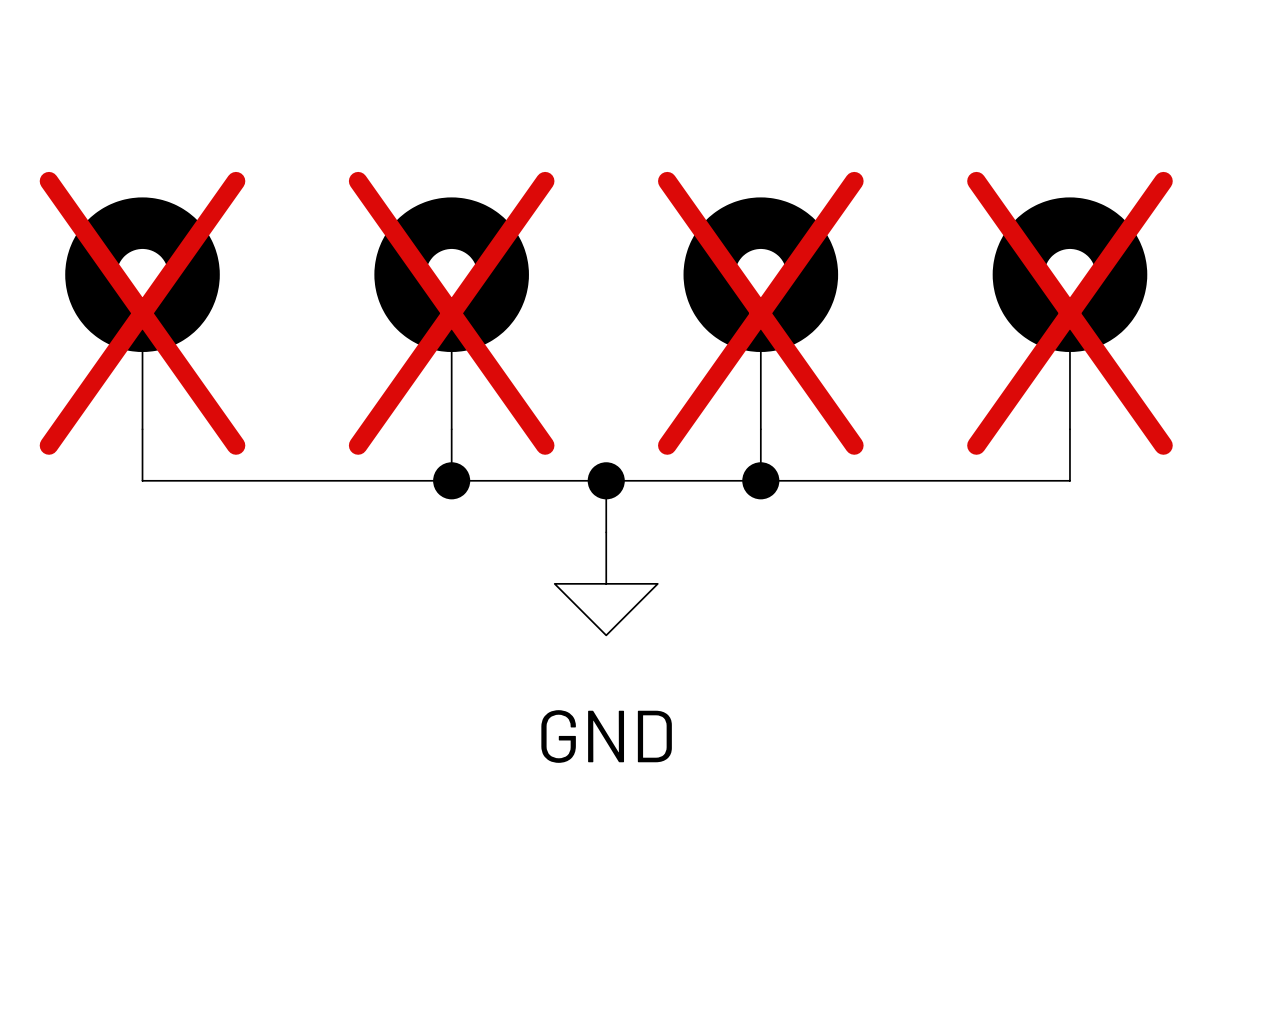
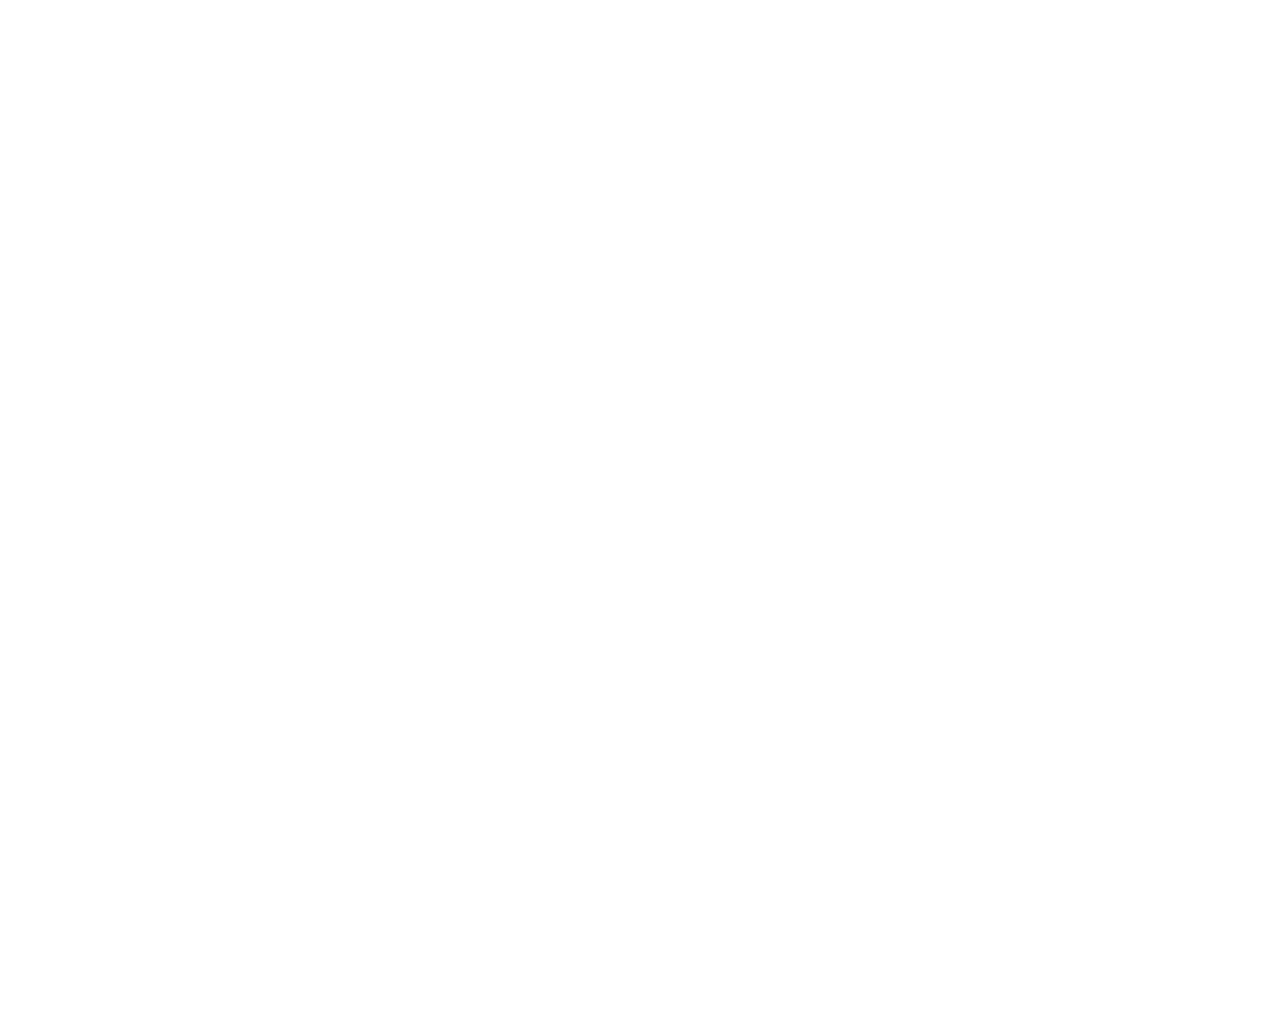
part: (142, 313) -> none
part: (451, 313) -> none
part: (760, 313) -> none
part: (1069, 313) -> none
wire: (142, 429) (142, 480) (1069, 480) (1069, 429) -> none
wire: (451, 429) (451, 480) -> none
wire: (760, 429) (760, 480) -> none
junction: (451, 480) -> none
wire: (606, 480) (606, 532) -> none
junction: (606, 480) -> none
junction: (760, 480) -> none
power symbol: GND (606, 583) -> none

